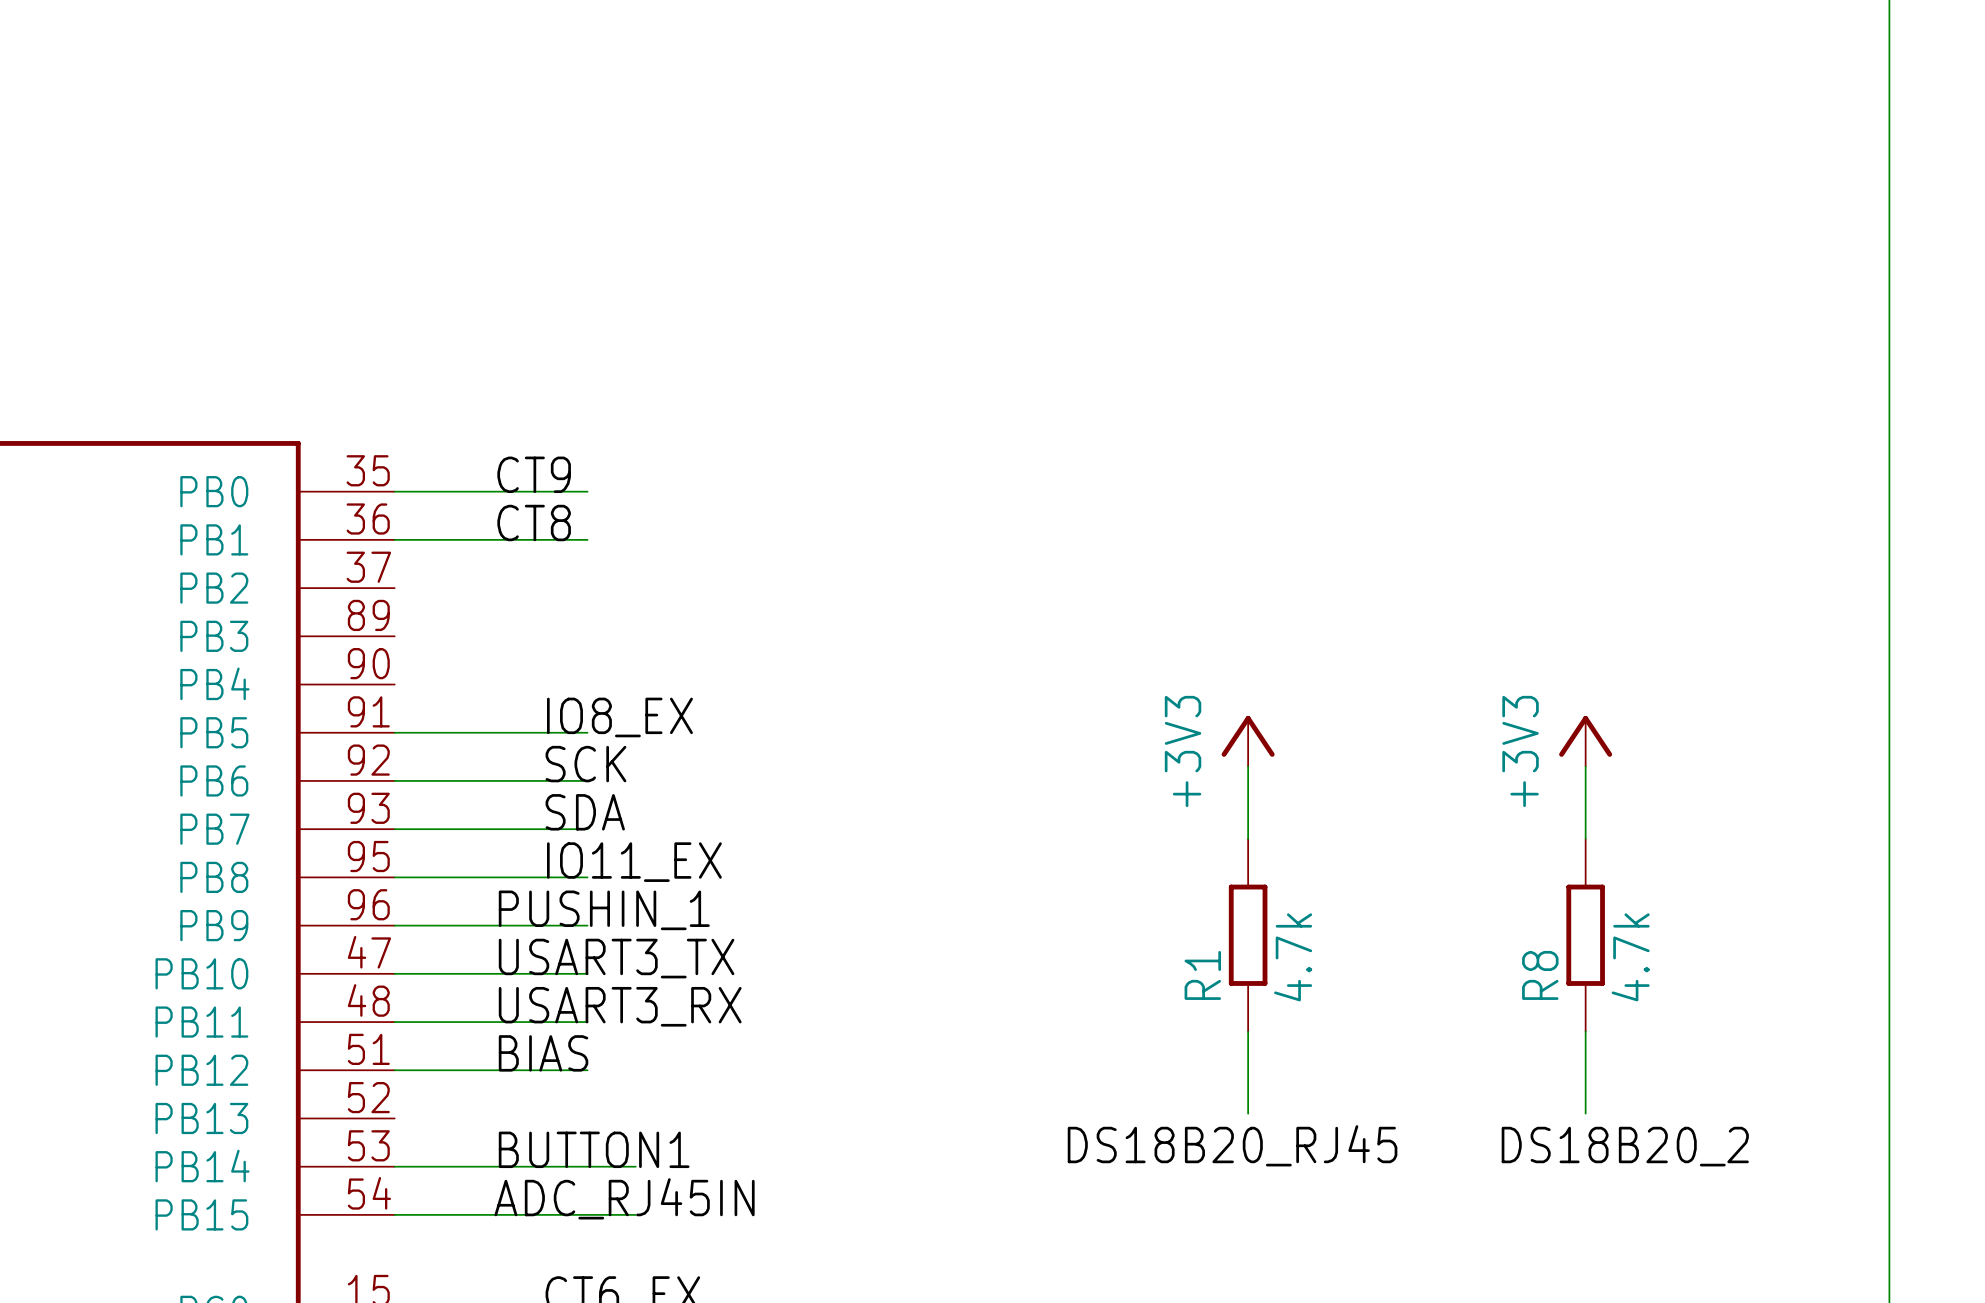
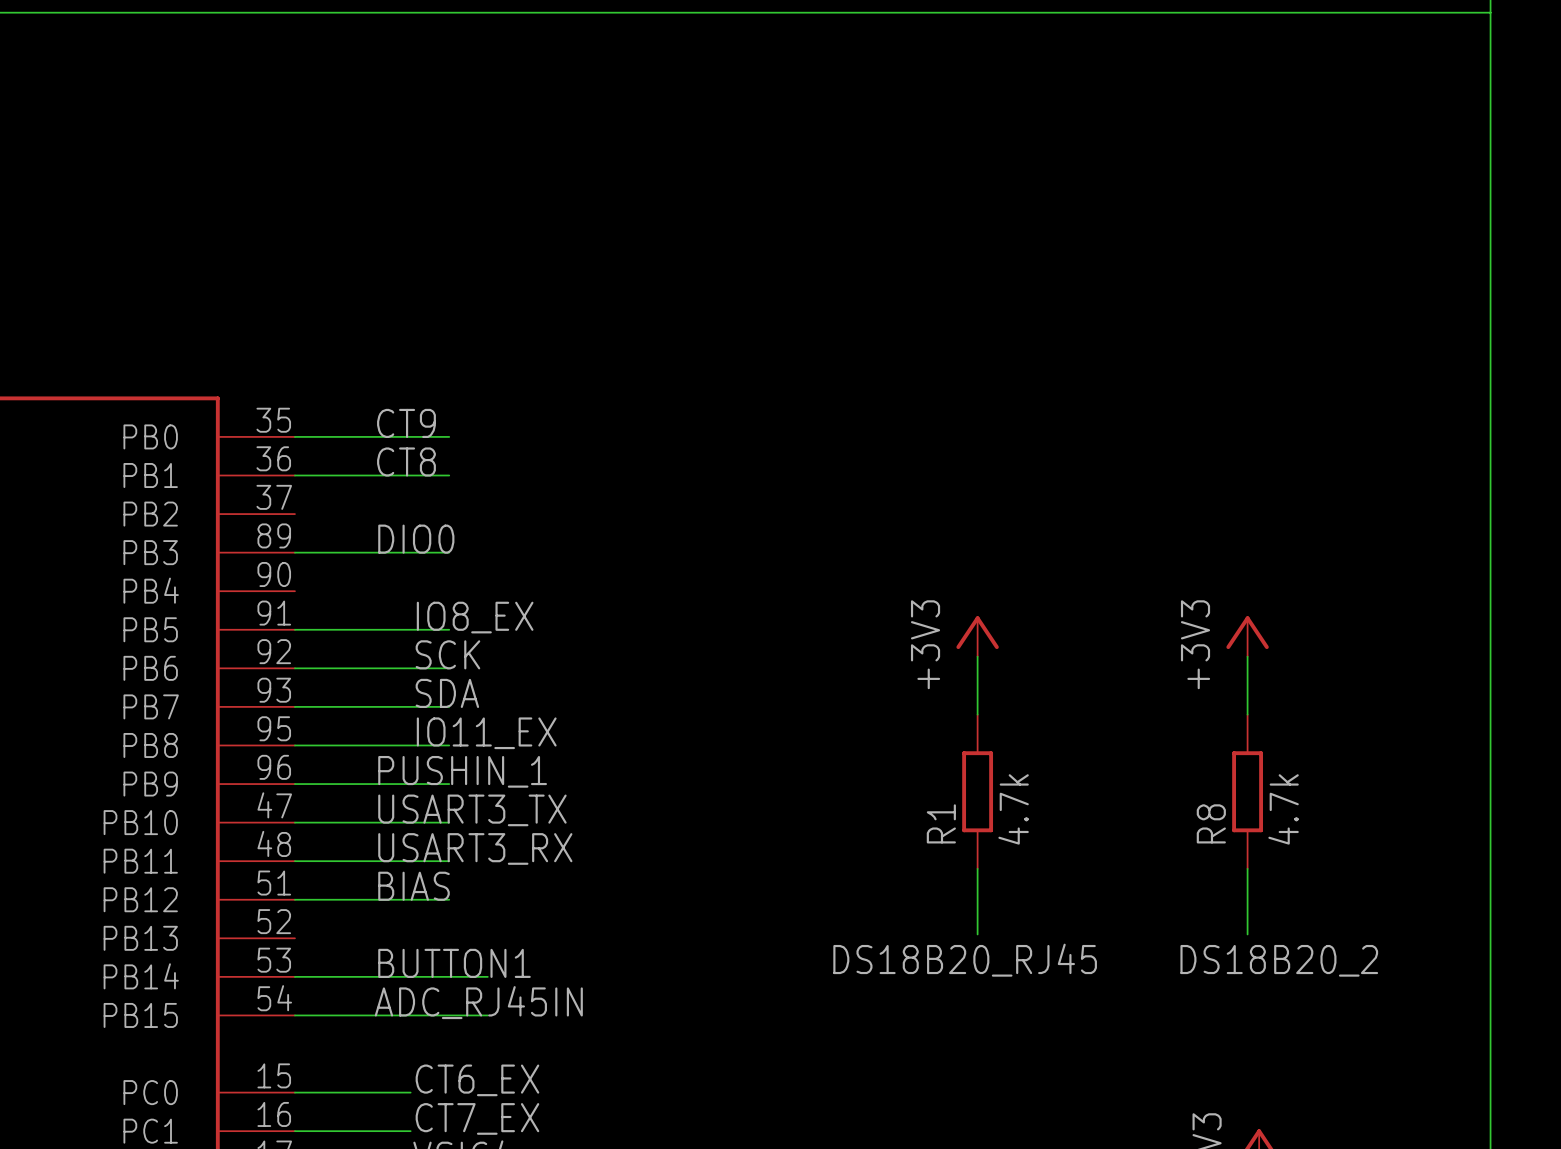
label: none -> DIO0 (416, 539)
wire: none -> (294, 552) (449, 552)

